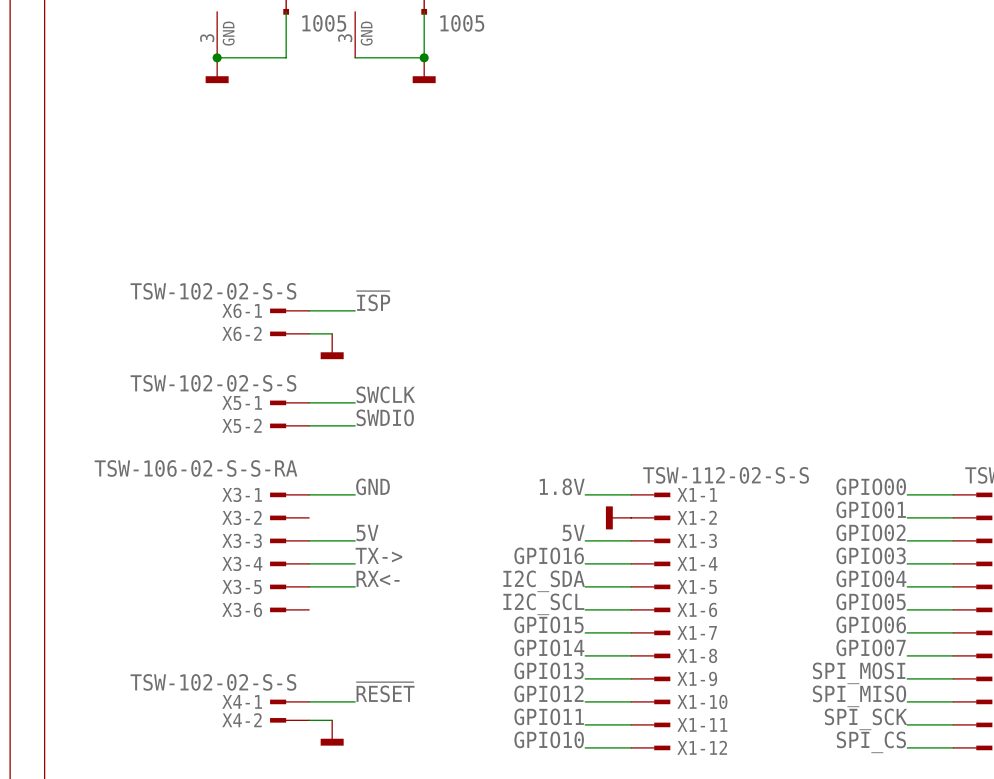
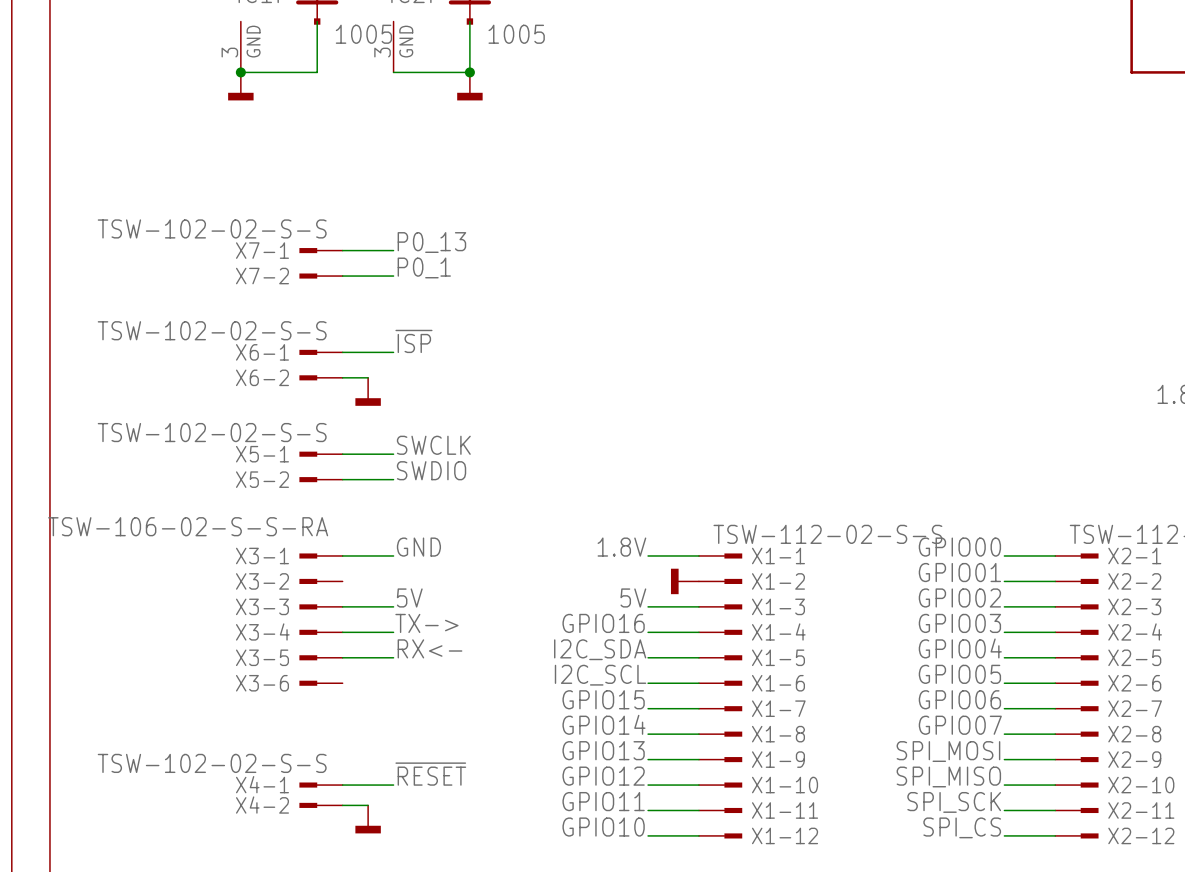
label: none -> P0_13 (431, 242)
X7-1: none -> TSW-102-02-S-S (321, 250)
wire: none -> (342, 250) (393, 250)
label: none -> P0_1 (424, 267)
X7-2: none -> (321, 276)
wire: none -> (342, 276) (393, 276)

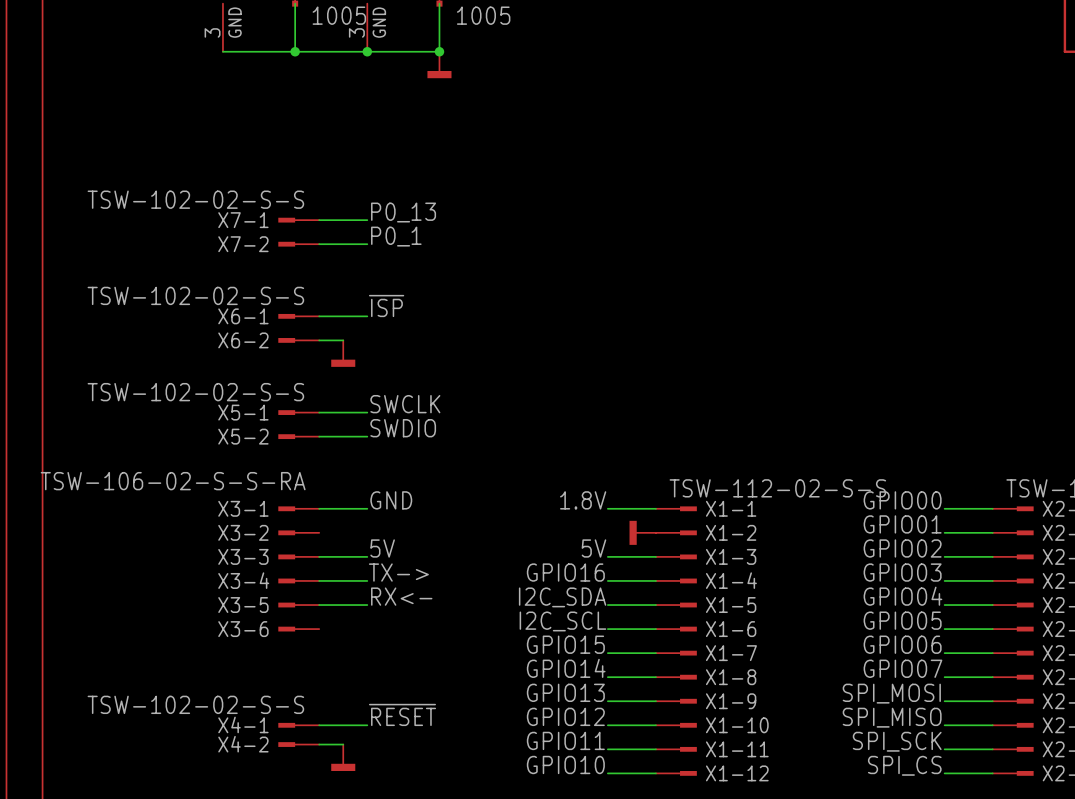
junction: (240, 72) -> none
wire: none -> (295, 51) (367, 51)
junction: none -> (295, 51)
junction: none -> (367, 51)
power symbol: (240, 86) -> none

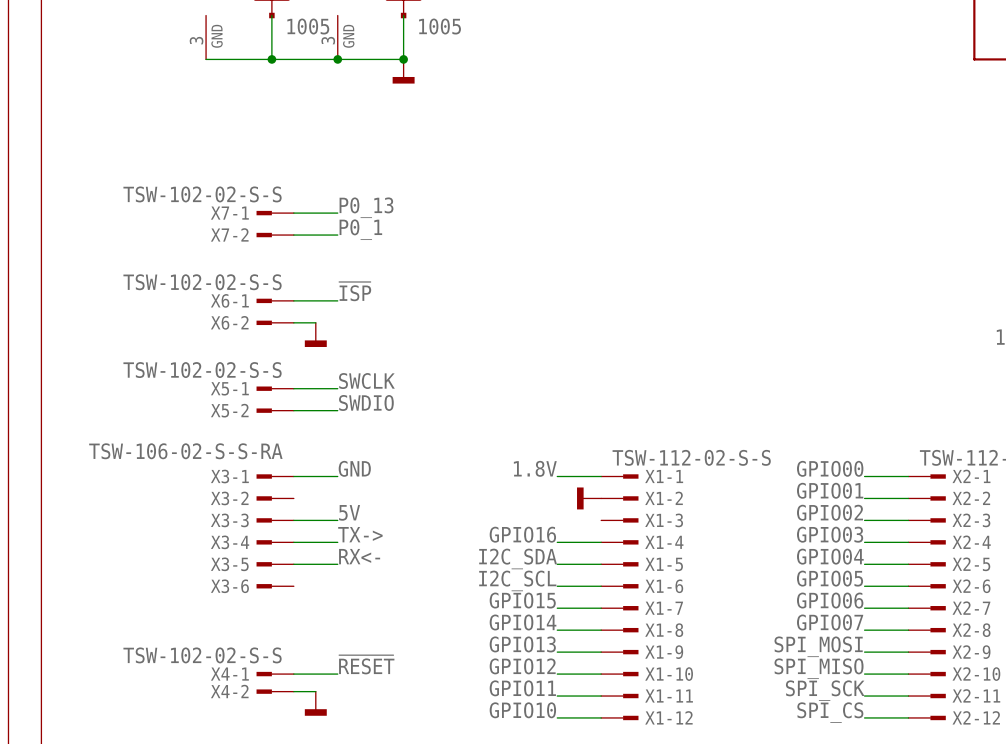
label: 5V (593, 548) -> none
wire: (607, 556) (655, 556) -> none

